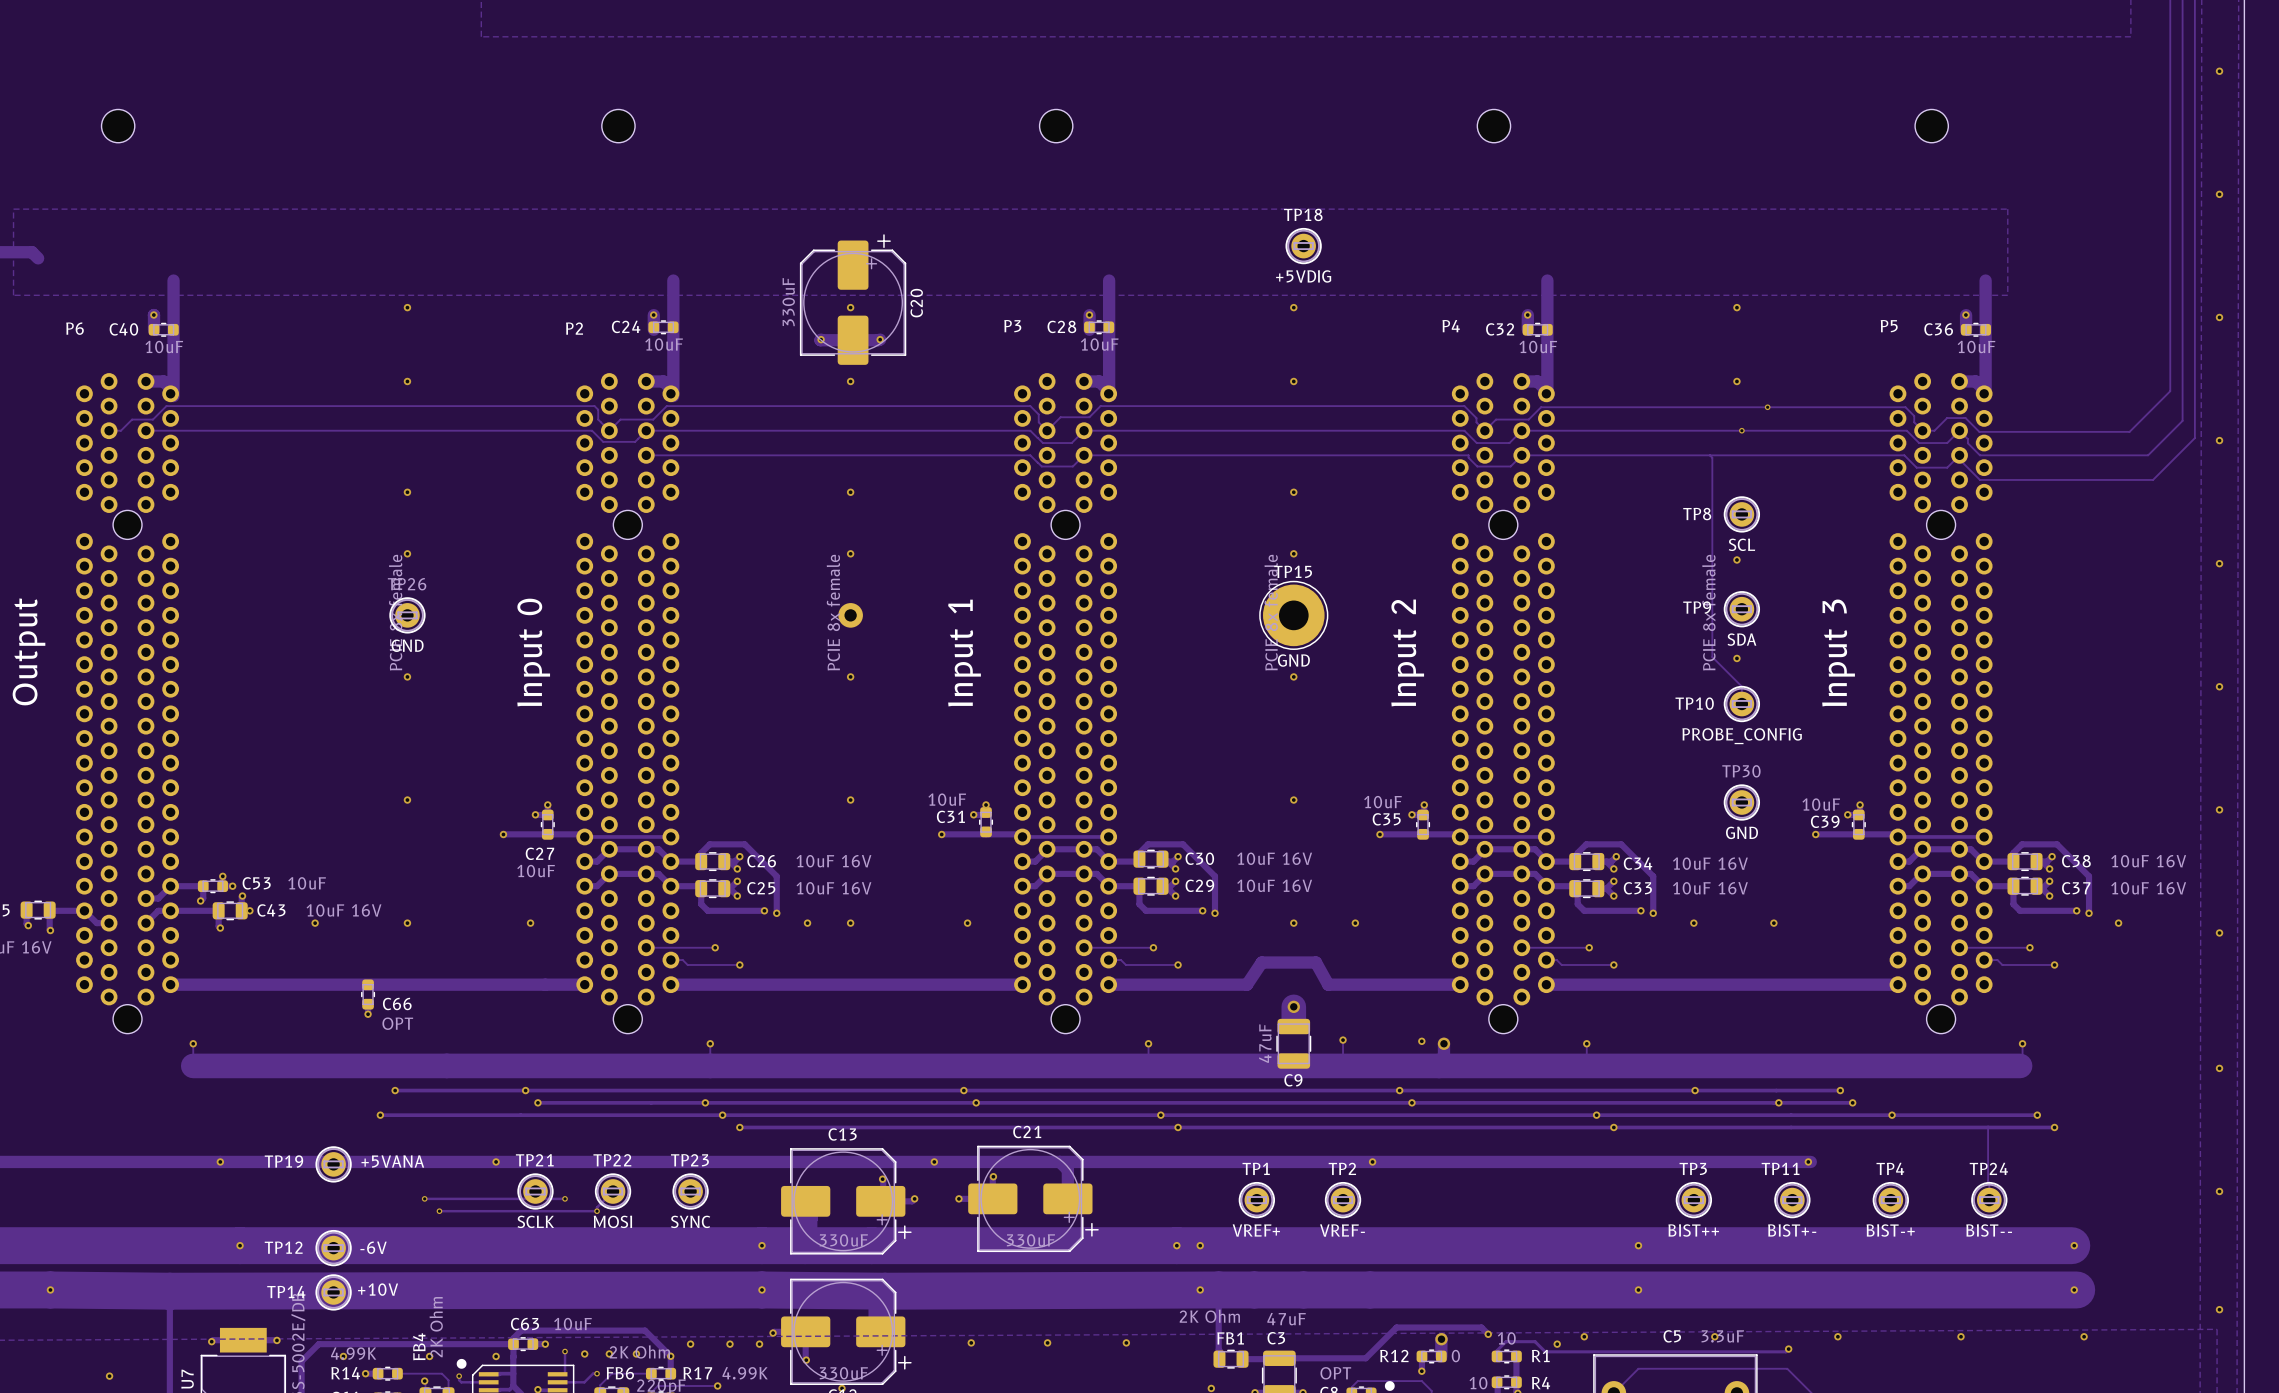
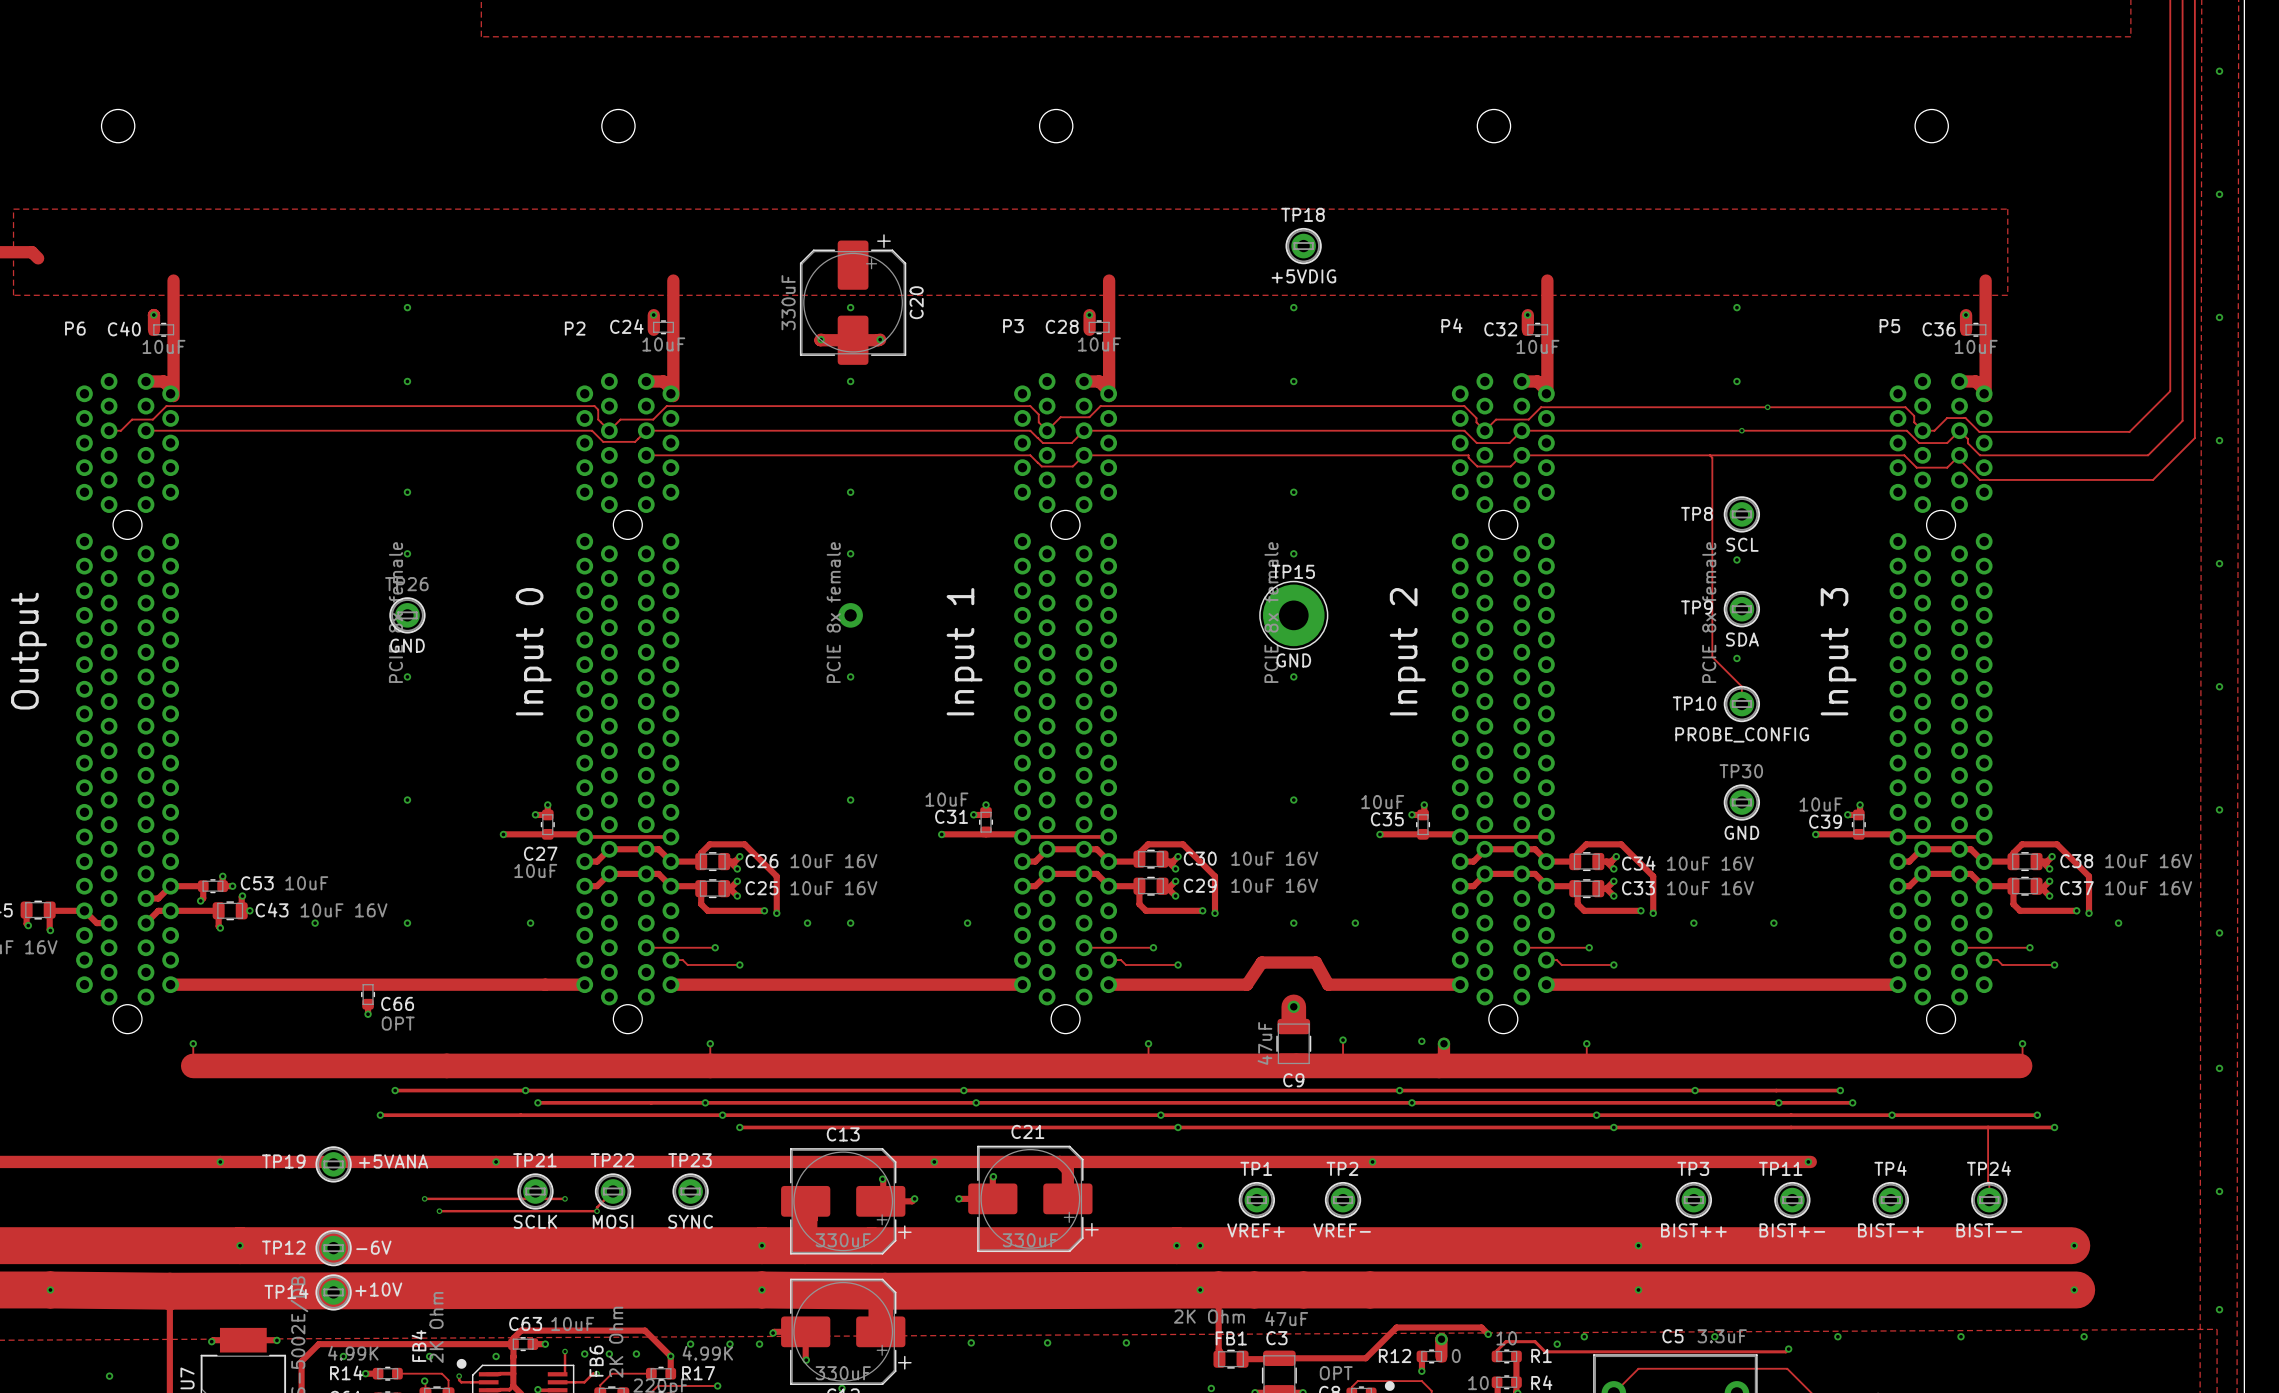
FB6 value rotation: 0° (639, 1351) -> 90° counterclockwise (616, 1342)
FB6 name rotation: 0° (620, 1373) -> 90° counterclockwise (596, 1361)
R17 value position: 4.99K (745, 1373) -> 4.99K (707, 1353)

